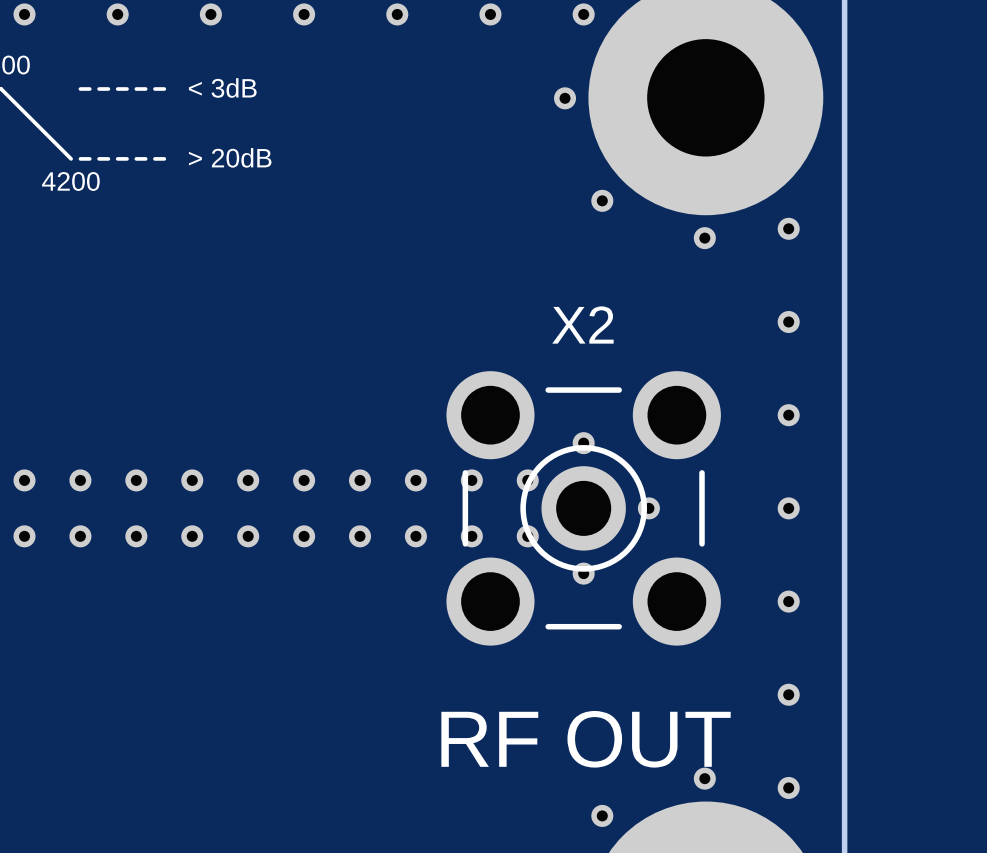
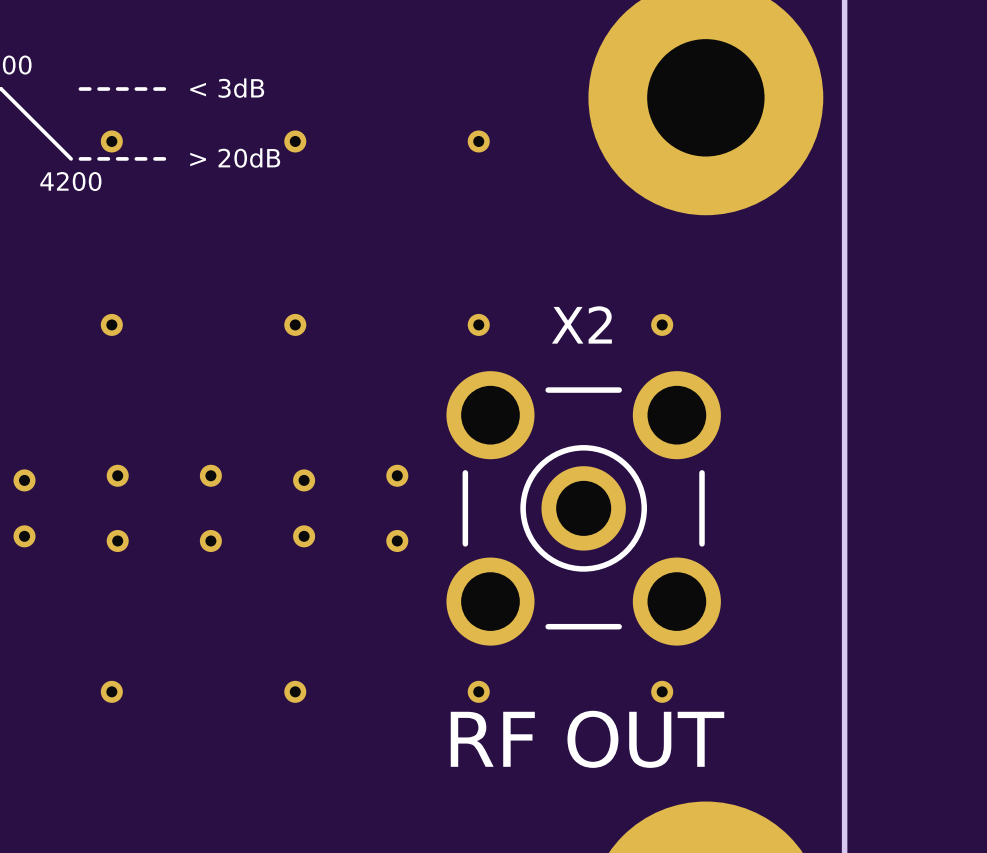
part: (24, 14) -> none
part: (117, 14) -> none
part: (210, 14) -> none
part: (304, 14) -> none
part: (397, 14) -> none
part: (490, 14) -> none
part: (583, 14) -> none
part: (565, 98) -> none
part: none -> (111, 141)
part: none -> (295, 141)
part: none -> (478, 141)
part: (602, 200) -> none
part: (788, 228) -> none
part: (704, 238) -> none
part: (788, 321) -> none
part: none -> (111, 324)
part: none -> (295, 324)
part: none -> (478, 324)
part: none -> (662, 324)
part: (788, 415) -> none
part: (583, 443) -> none
part: none -> (117, 475)
part: none -> (210, 475)
part: none -> (397, 475)
part: (80, 480) -> none
part: (136, 480) -> none
part: (192, 480) -> none
part: (248, 480) -> none
part: (360, 480) -> none
part: (415, 480) -> none
part: (471, 480) -> none
part: (527, 480) -> none
part: (648, 508) -> none
part: (788, 508) -> none
part: (80, 536) -> none
part: (136, 536) -> none
part: (192, 536) -> none
part: (248, 536) -> none
part: (360, 536) -> none
part: (415, 536) -> none
part: (471, 536) -> none
part: (527, 536) -> none
part: none -> (117, 541)
part: none -> (210, 541)
part: none -> (397, 541)
part: (583, 573) -> none
part: (788, 601) -> none
part: none -> (111, 691)
part: none -> (295, 691)
part: none -> (478, 691)
part: none -> (662, 691)
part: (788, 694) -> none
part: (704, 778) -> none
part: (788, 787) -> none
part: (602, 815) -> none

